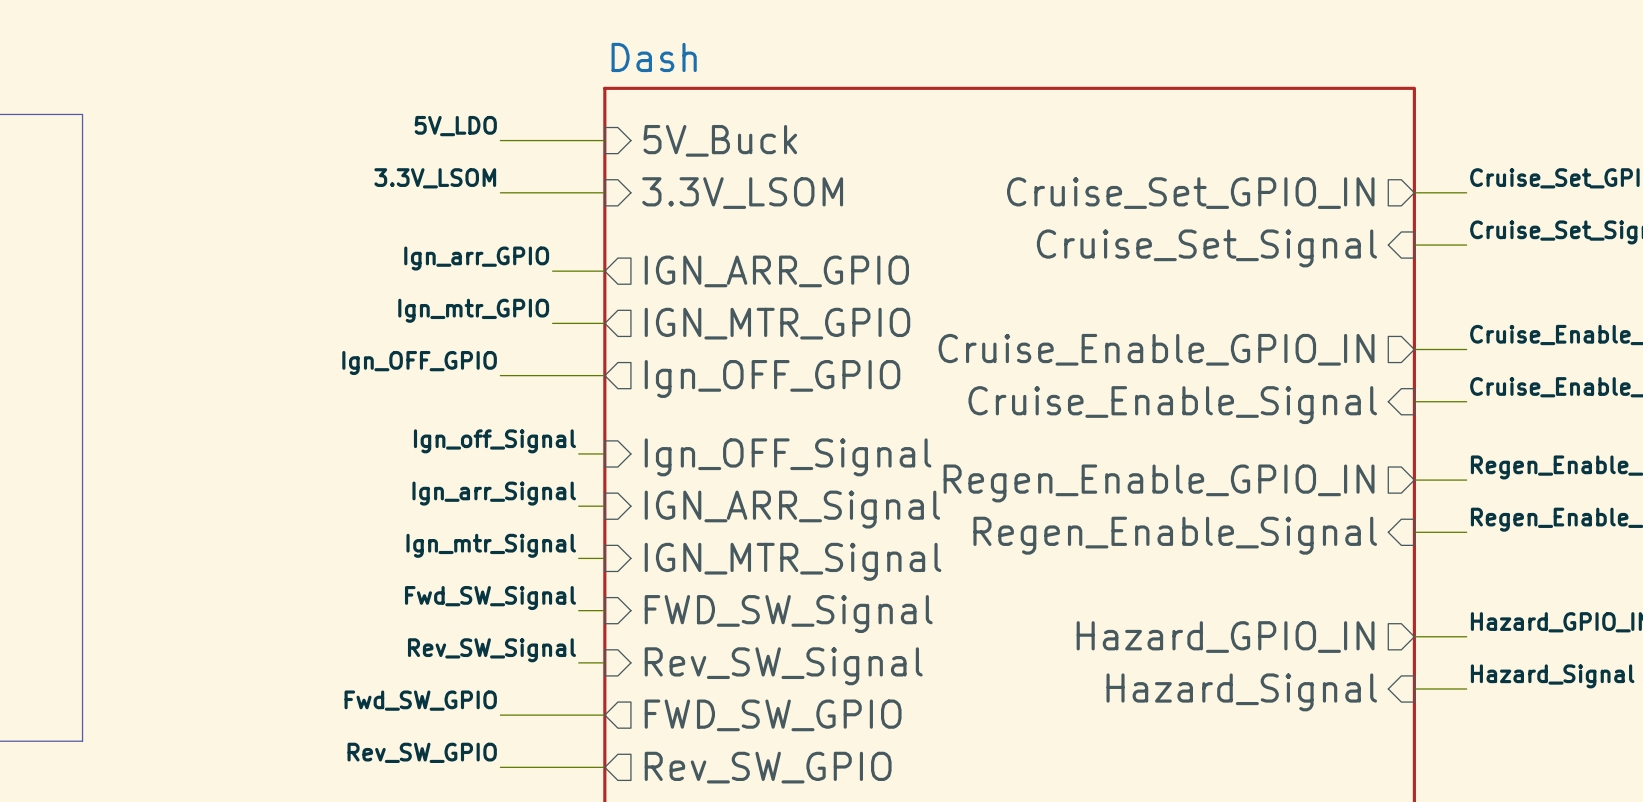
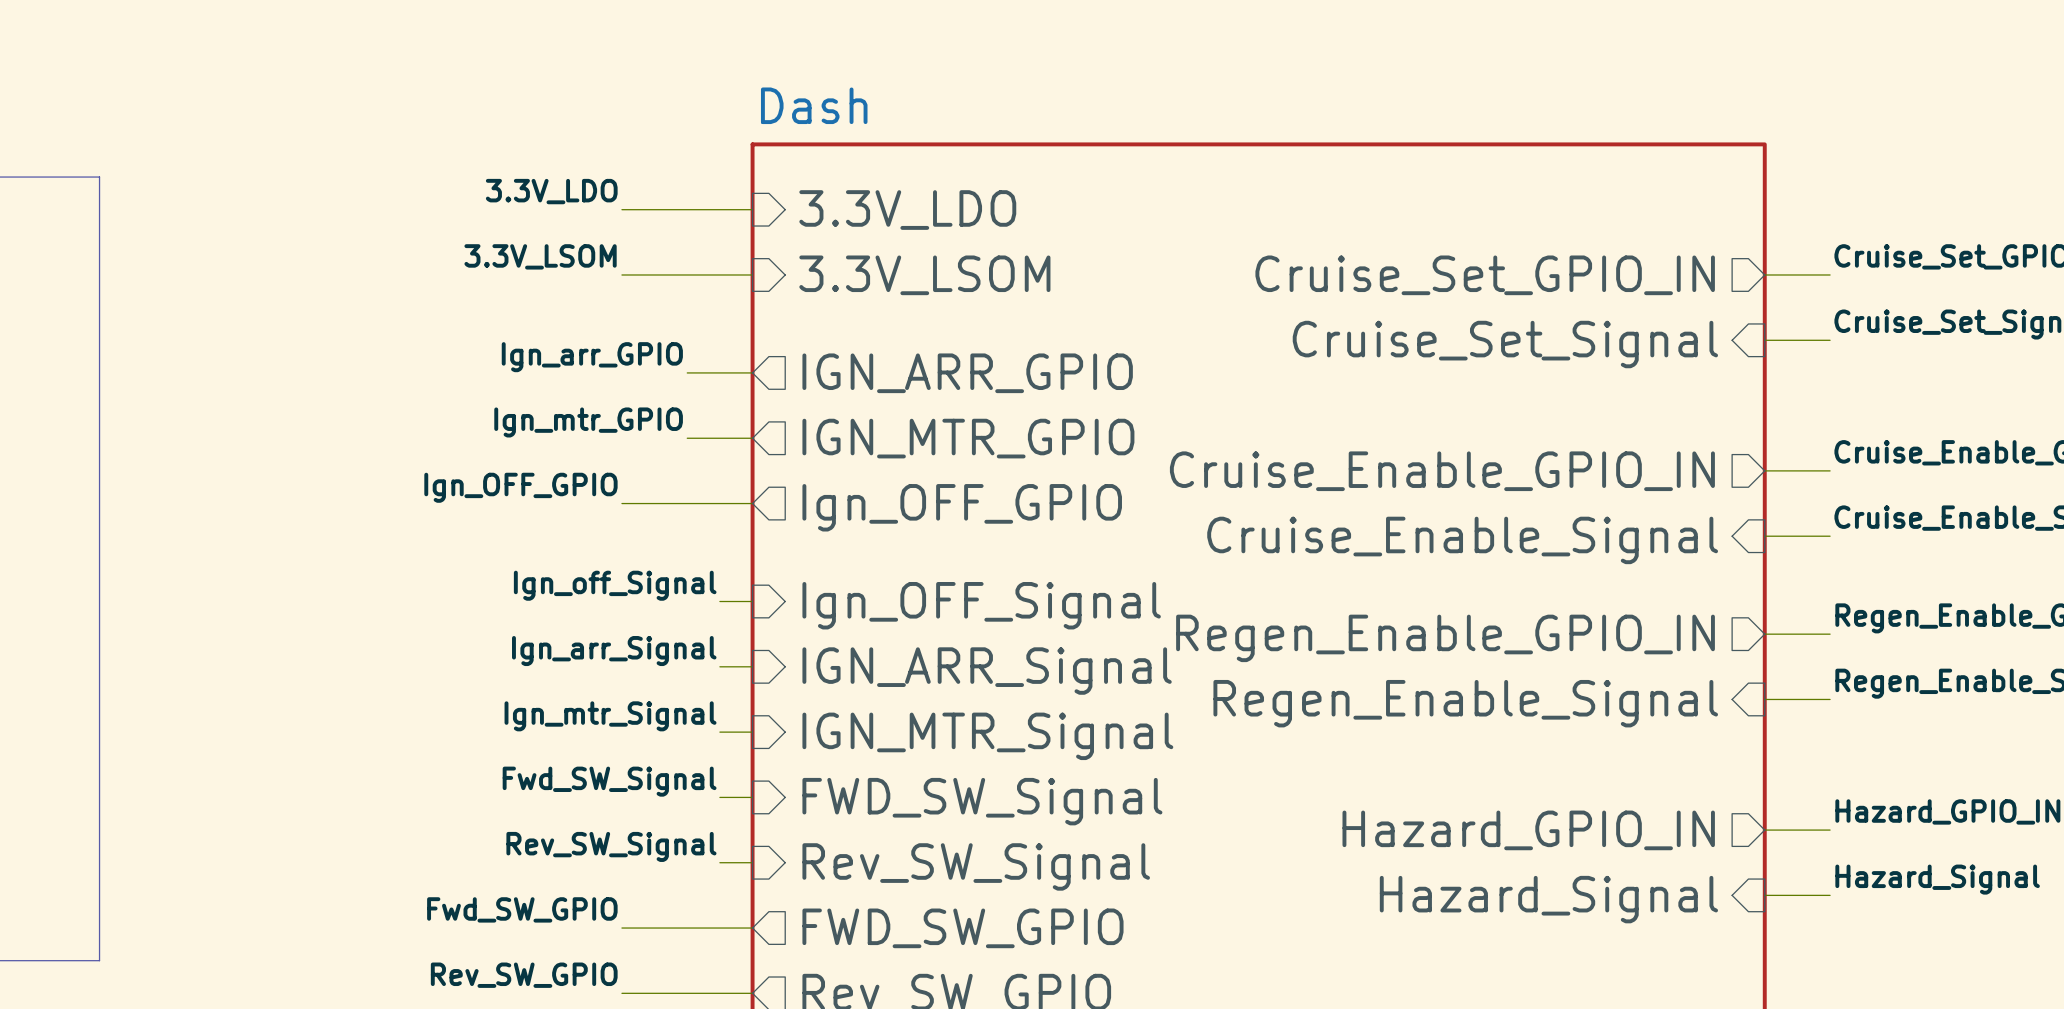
label: 5V_LDO (455, 126) -> 3.3V_LDO (551, 191)
sheet pin: 5V_Buck (720, 140) -> 3.3V_LDO (907, 210)

